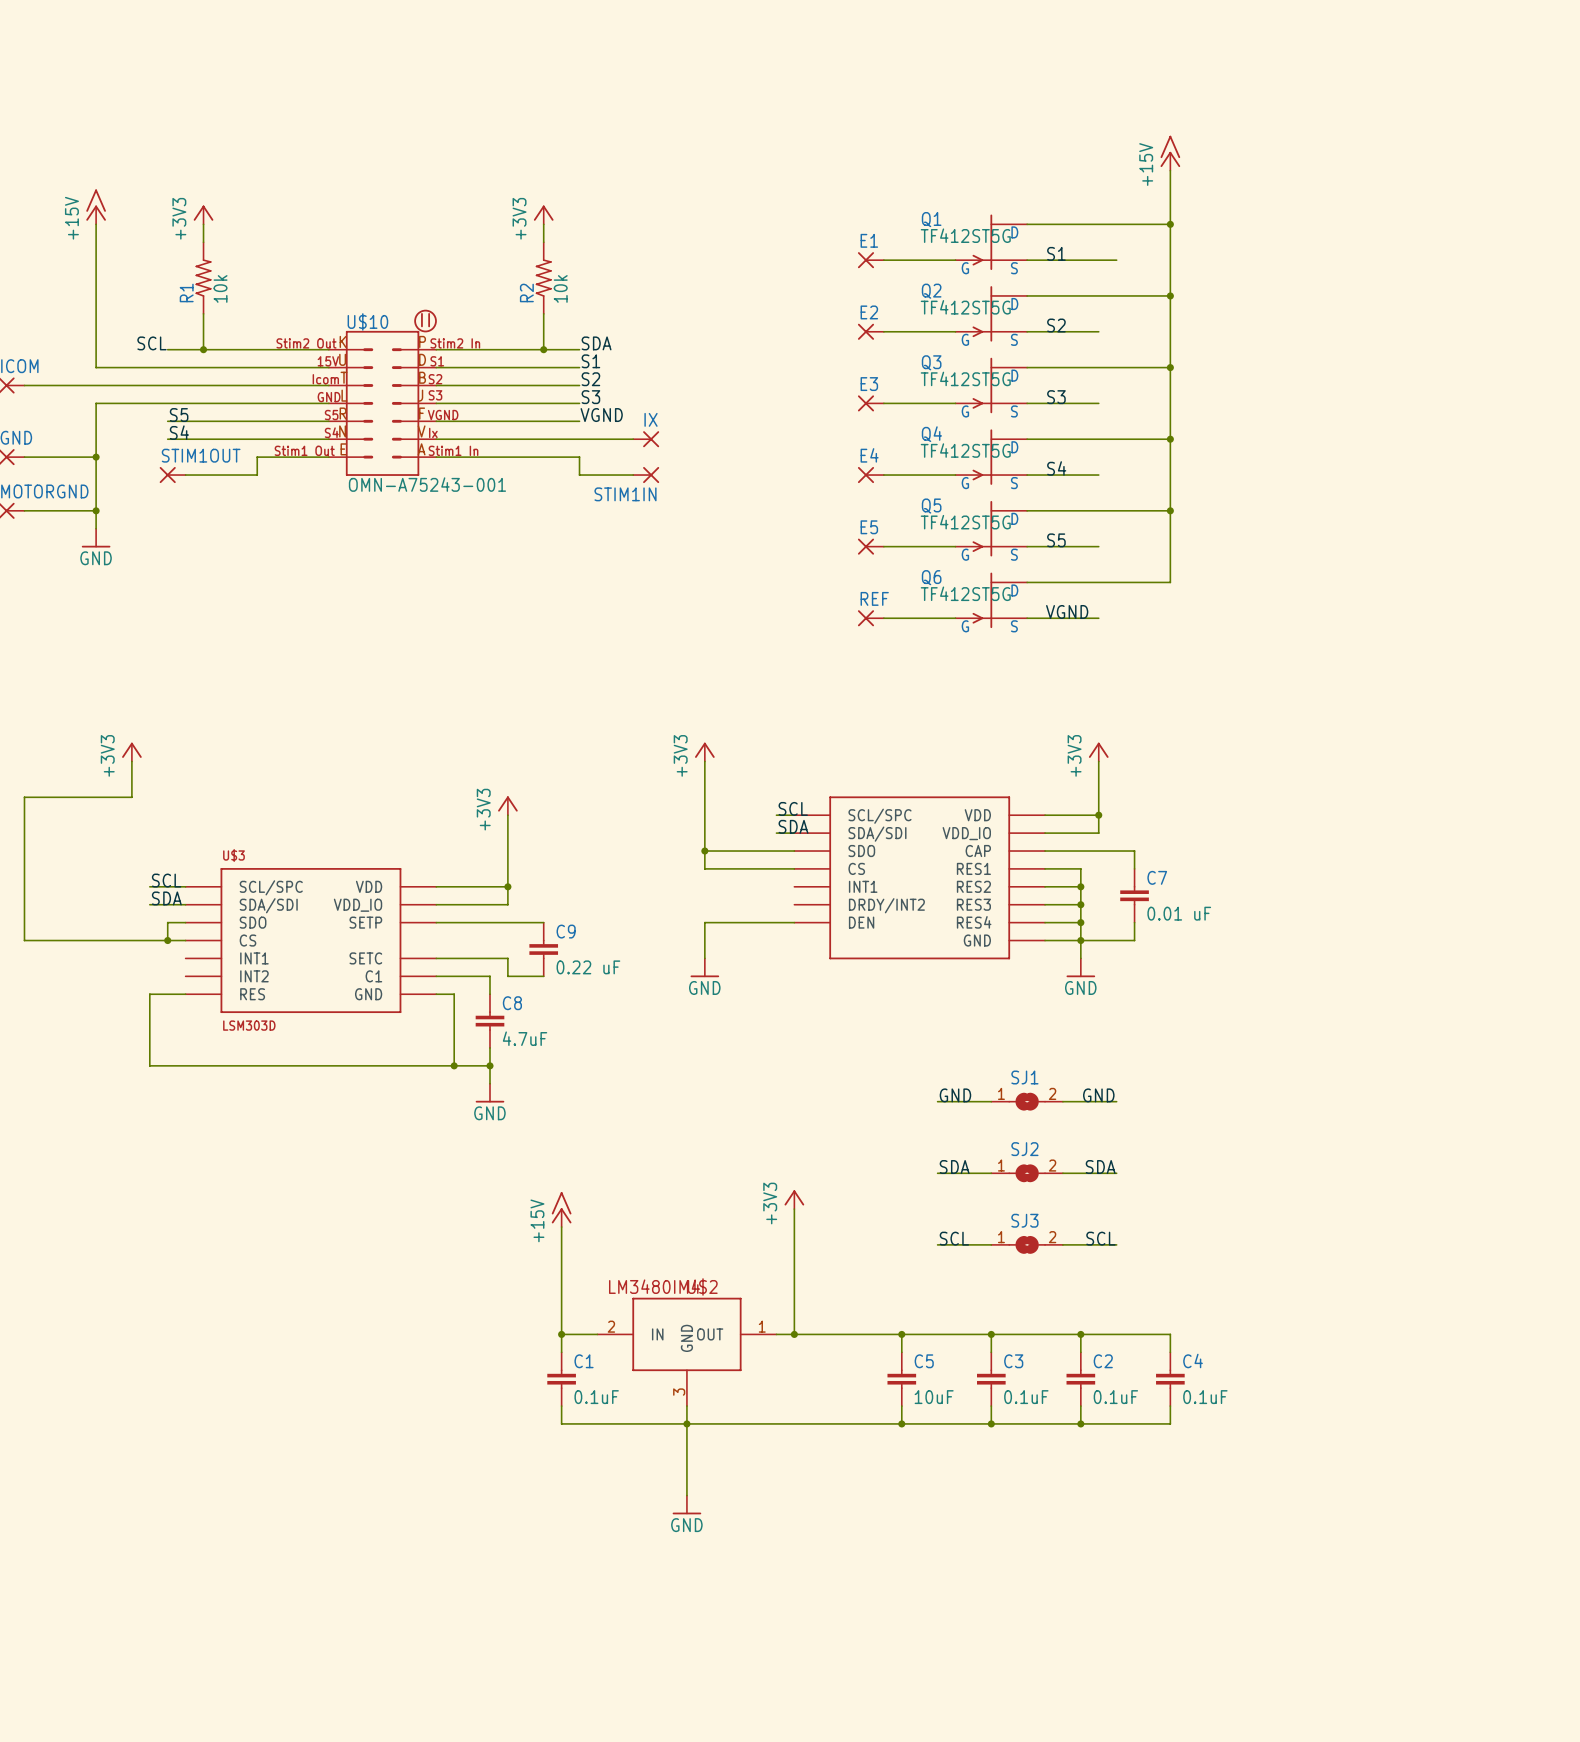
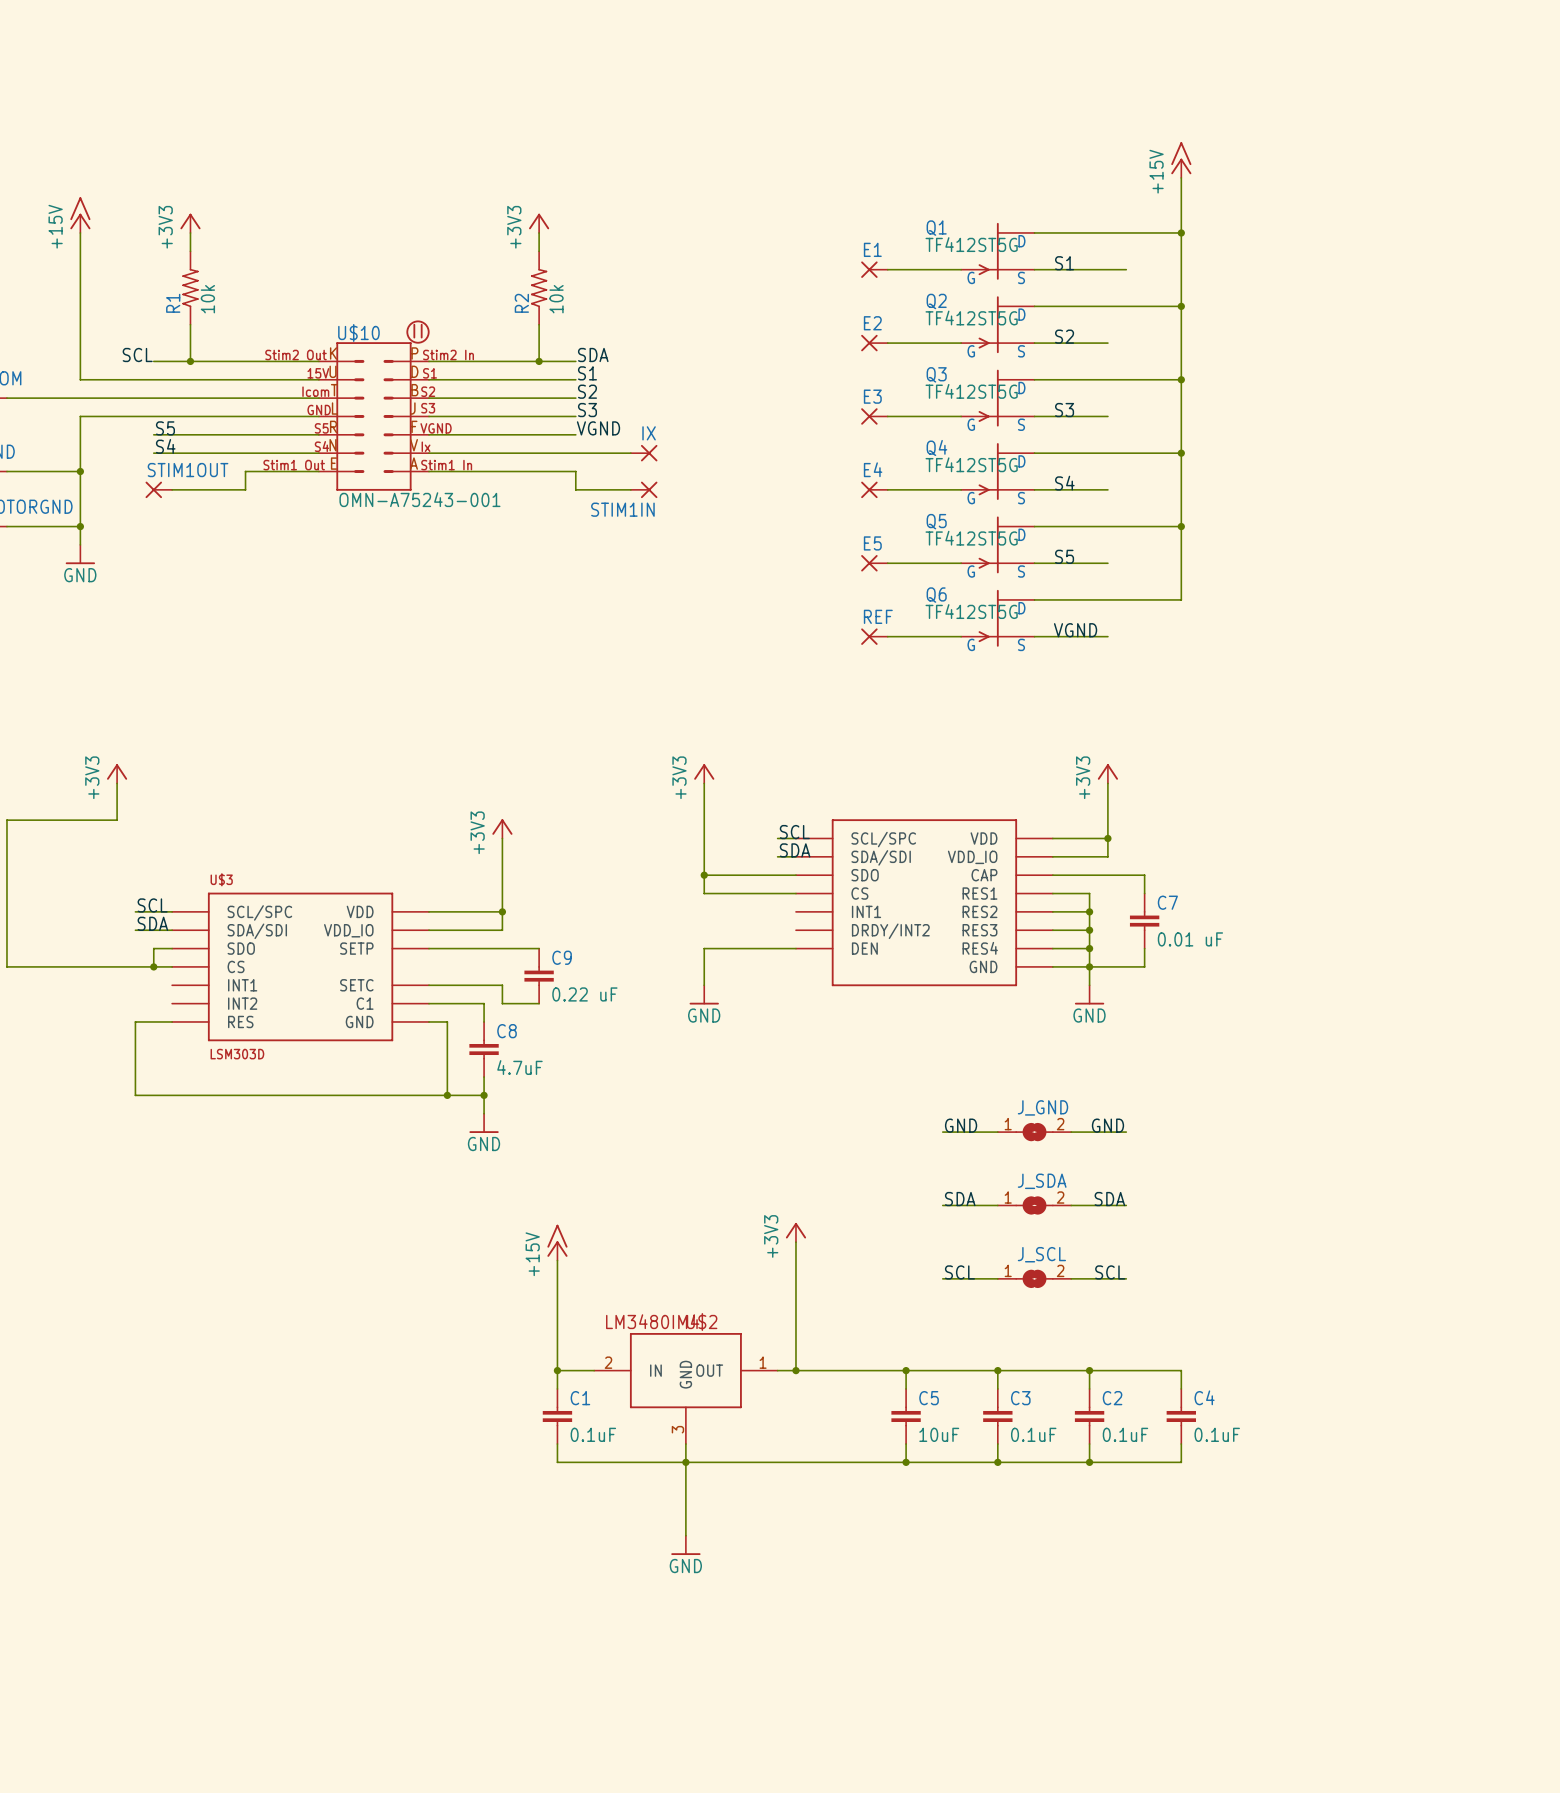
SJ1 name: SJ1 (1024, 1077) -> J_GND (1043, 1107)
SJ2 name: SJ2 (1024, 1149) -> J_SDA (1042, 1181)
SJ3 name: SJ3 (1024, 1220) -> J_SCL (1041, 1254)

